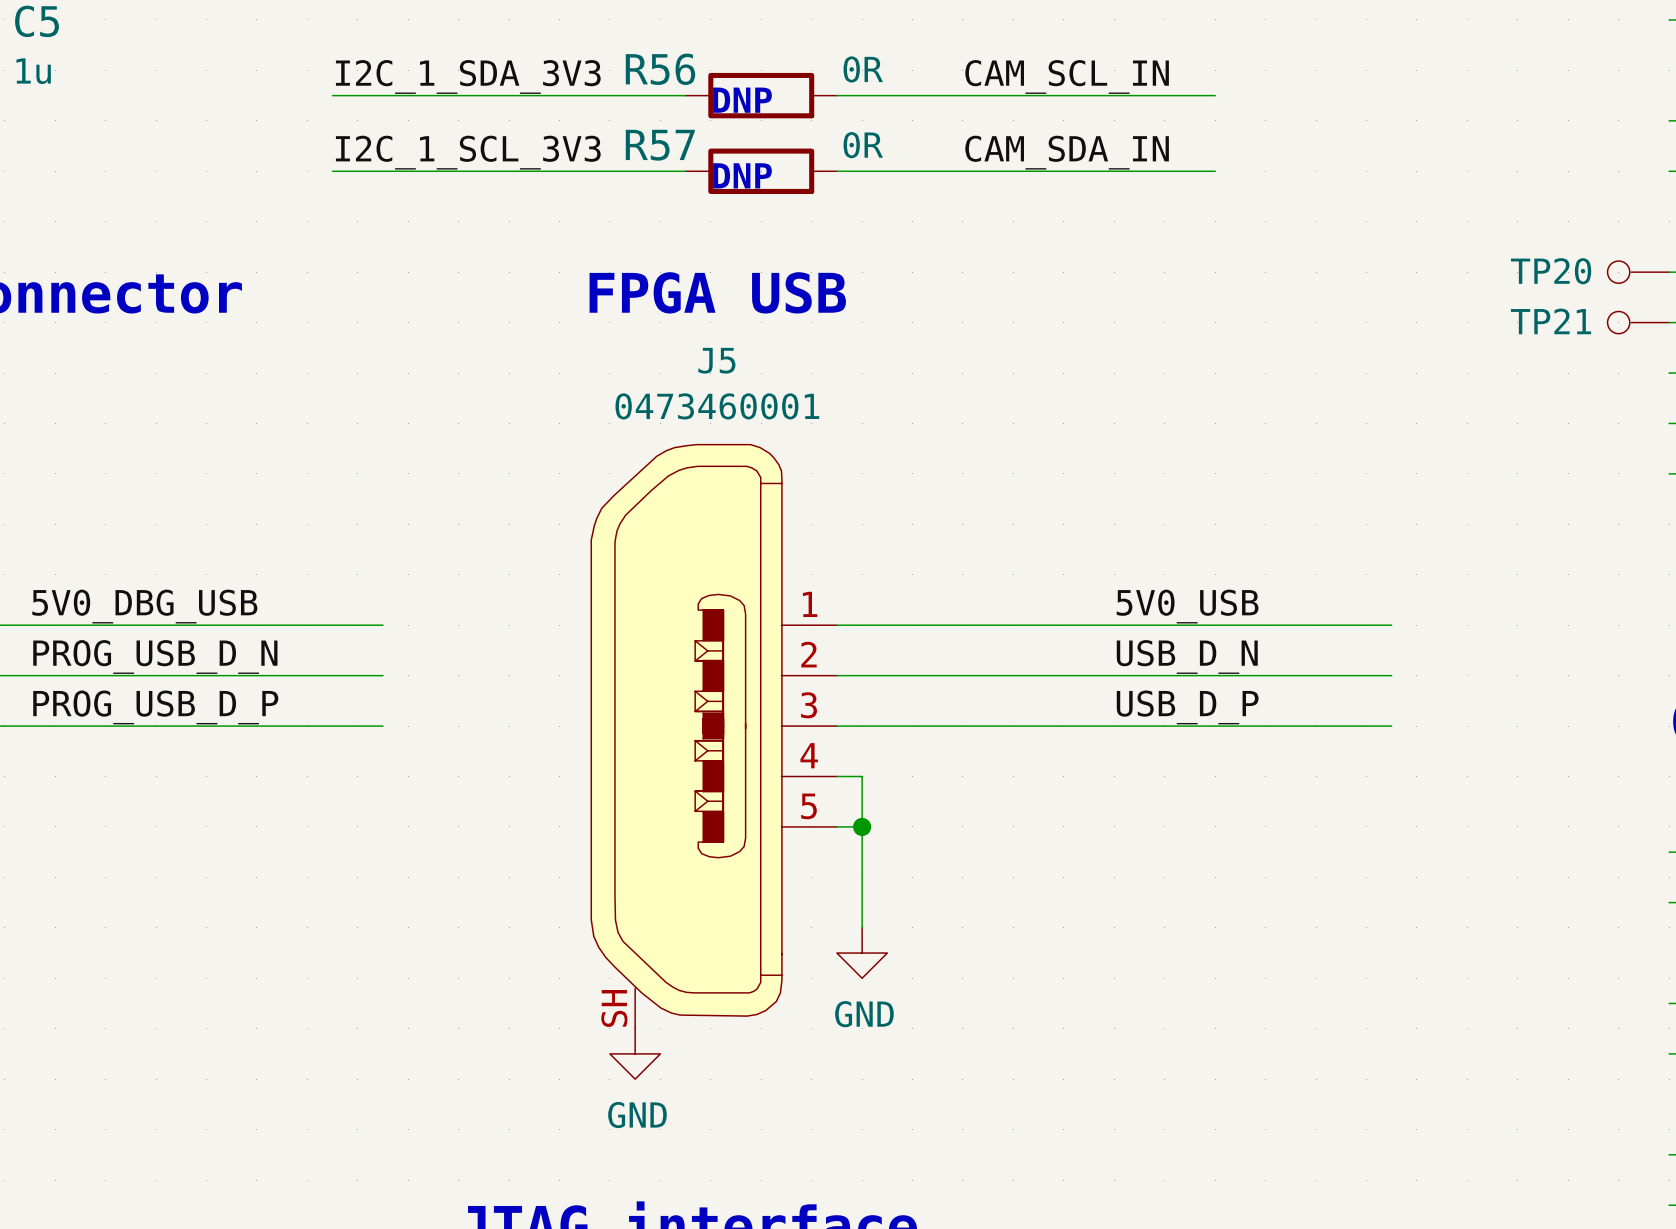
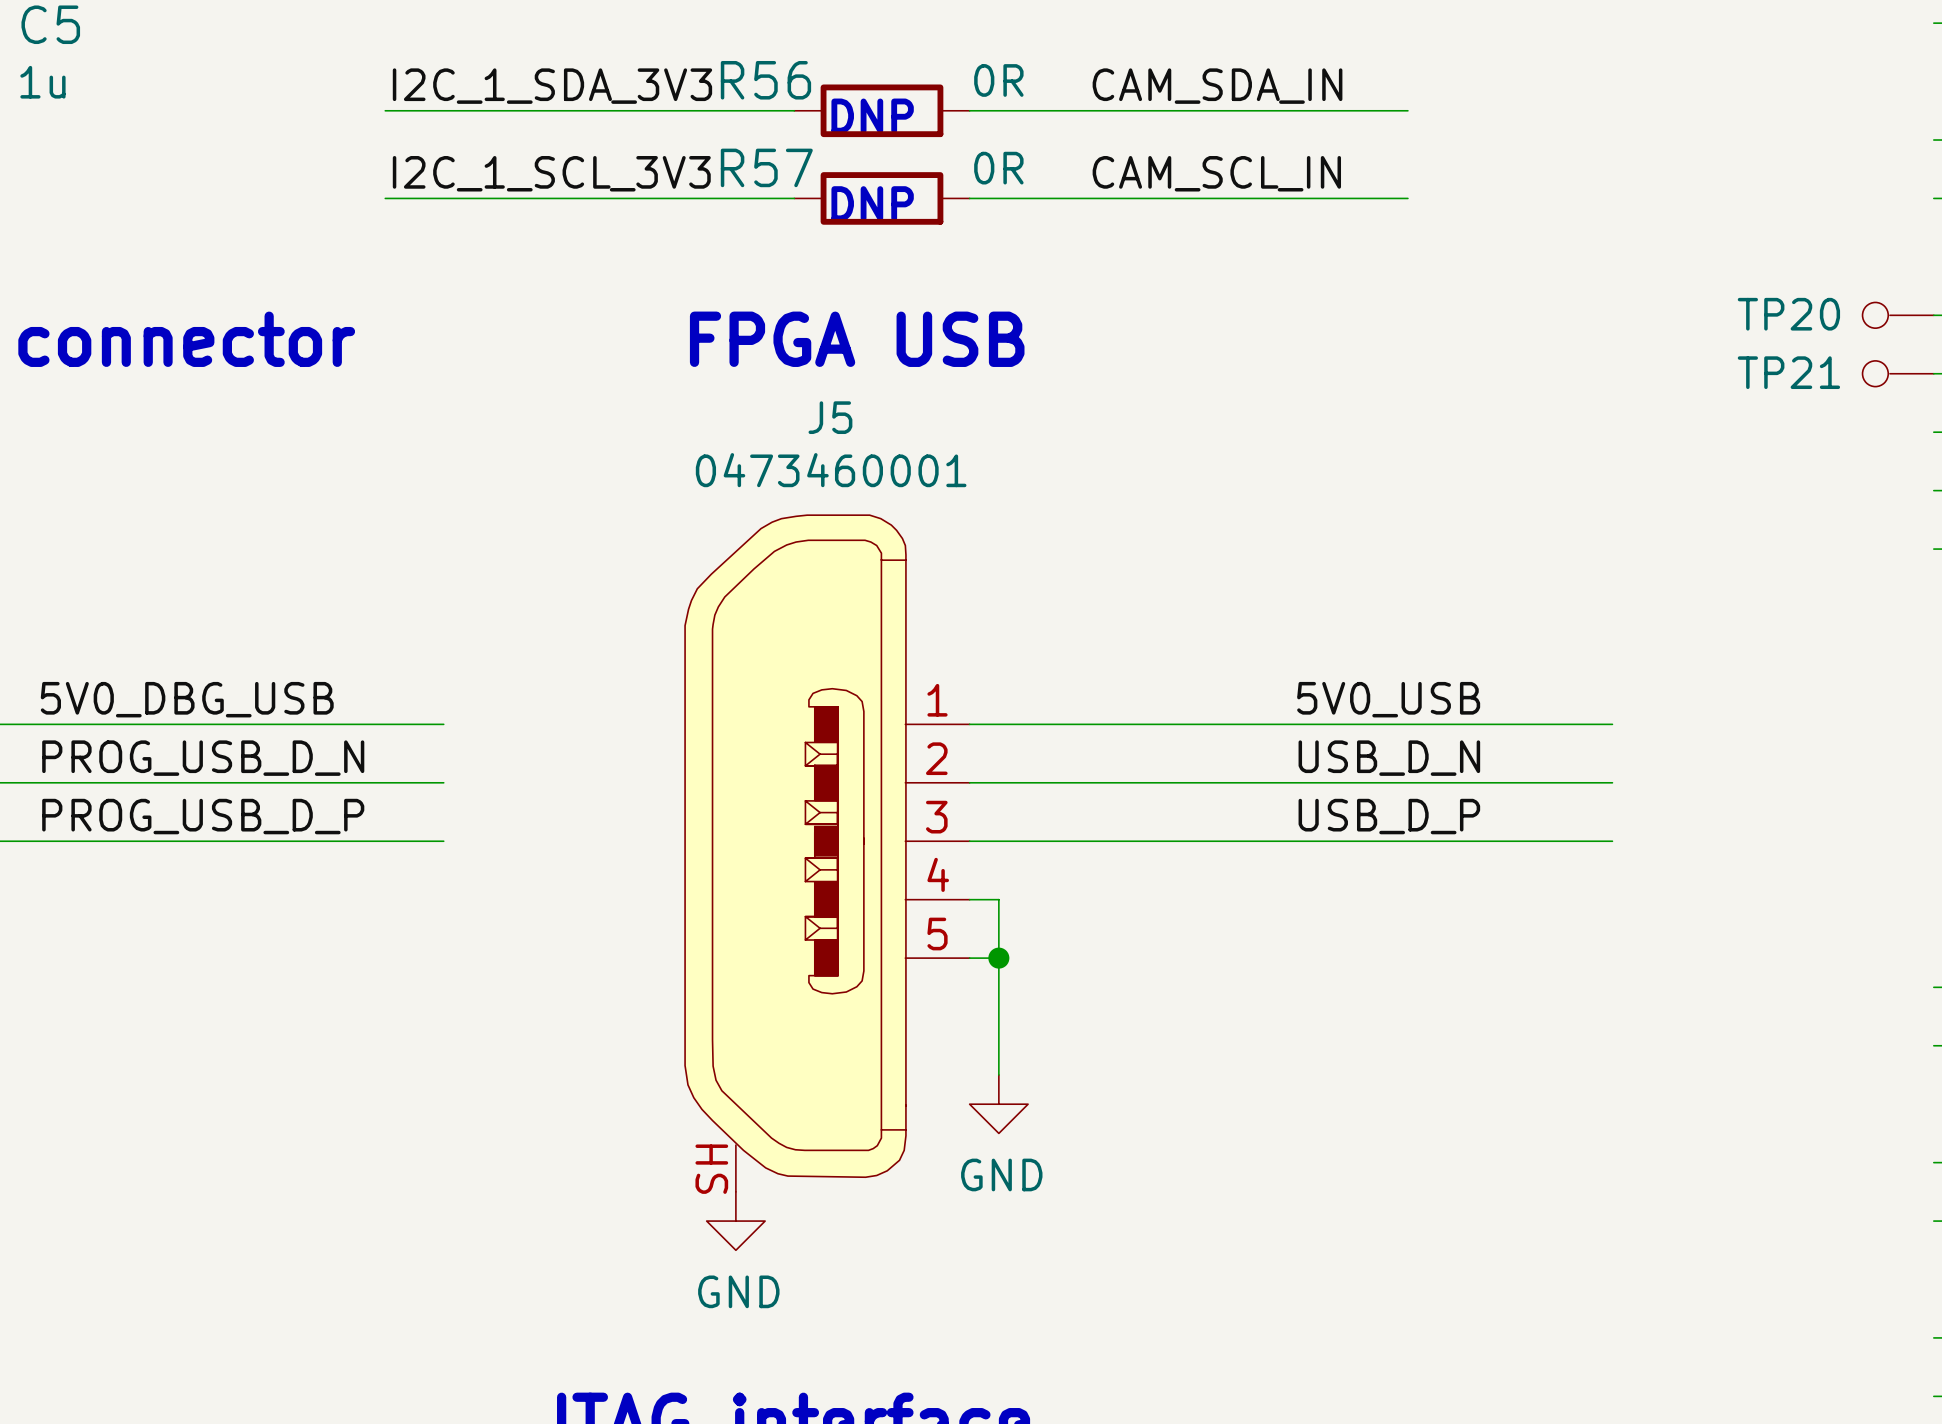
label position: CAM_SCL_IN (1067, 76) -> CAM_SCL_IN (1216, 173)
label position: CAM_SDA_IN (1067, 152) -> CAM_SDA_IN (1217, 86)

